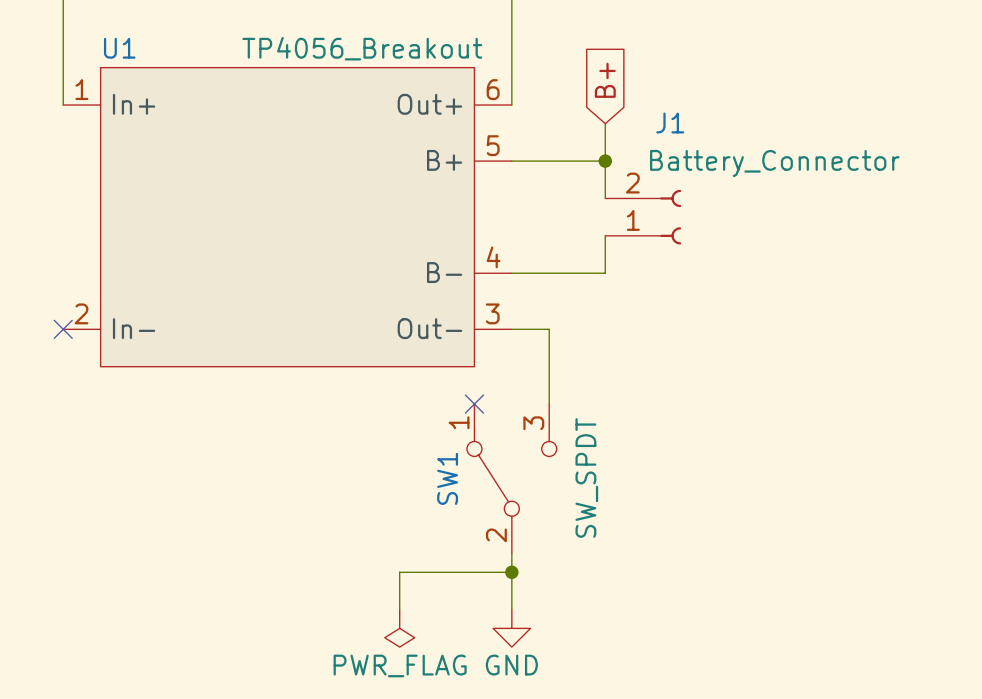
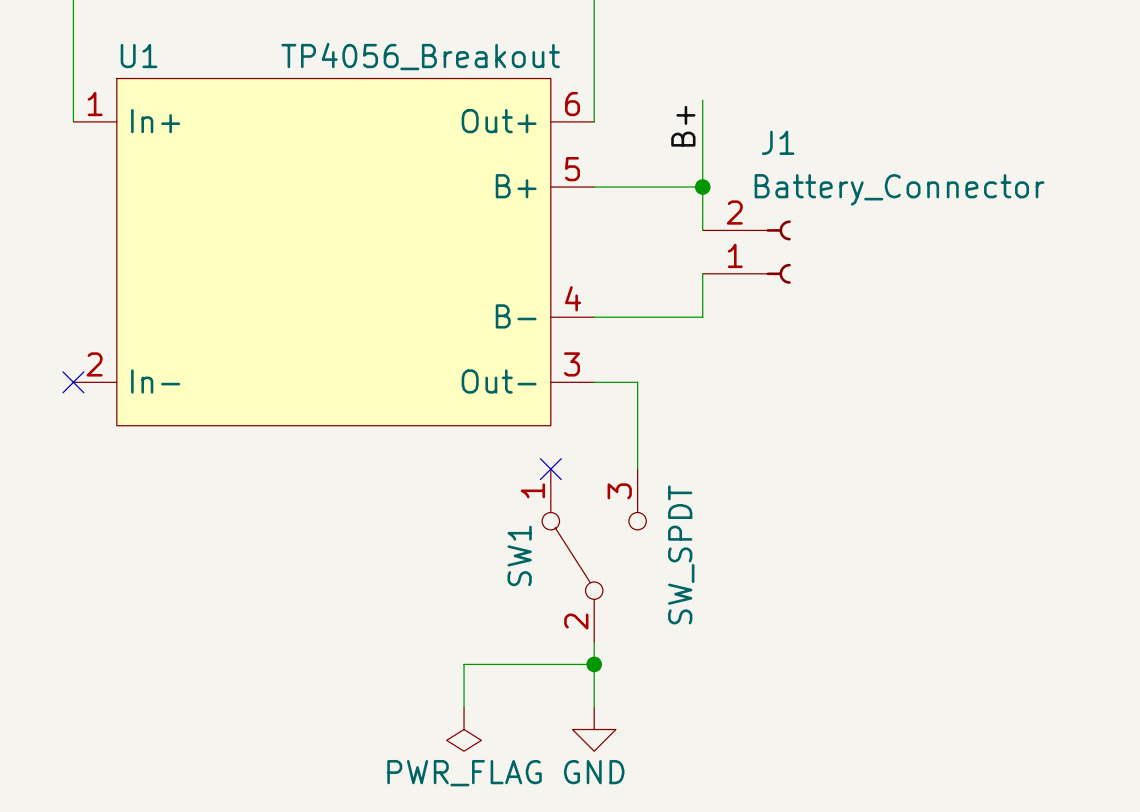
global label: B+ (605, 80) -> none
wire: none -> (702, 100) (702, 143)
label: none -> B+ (683, 126)

